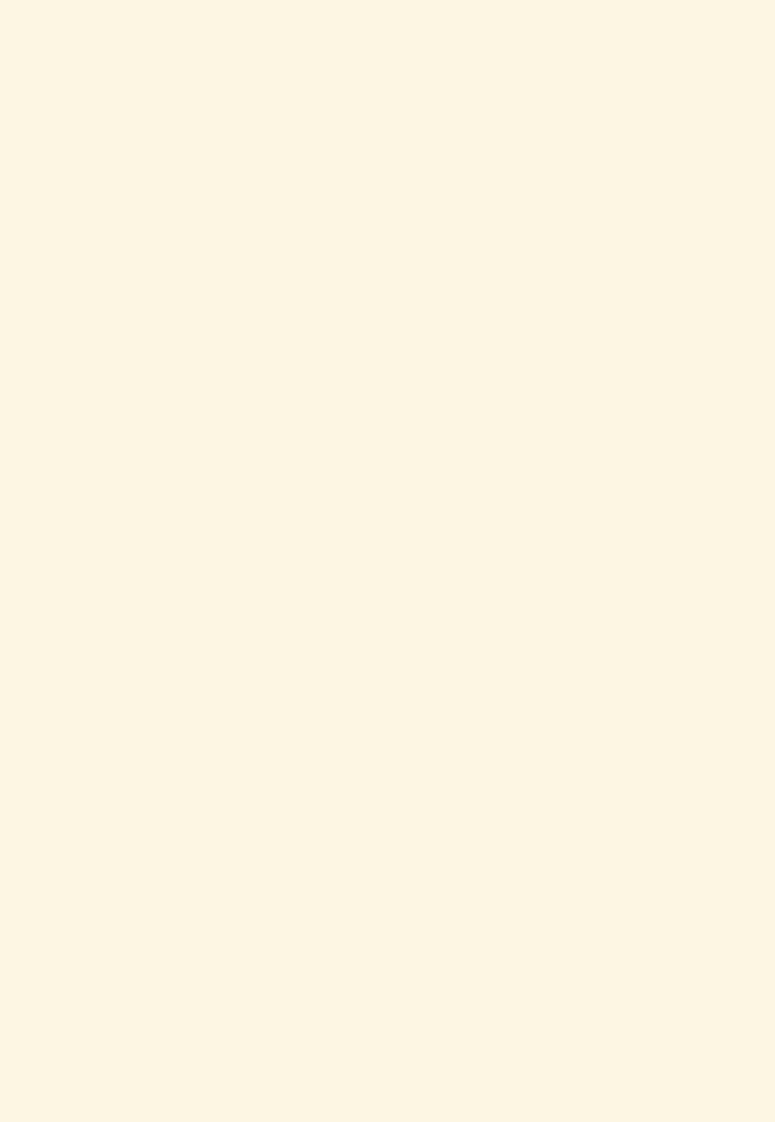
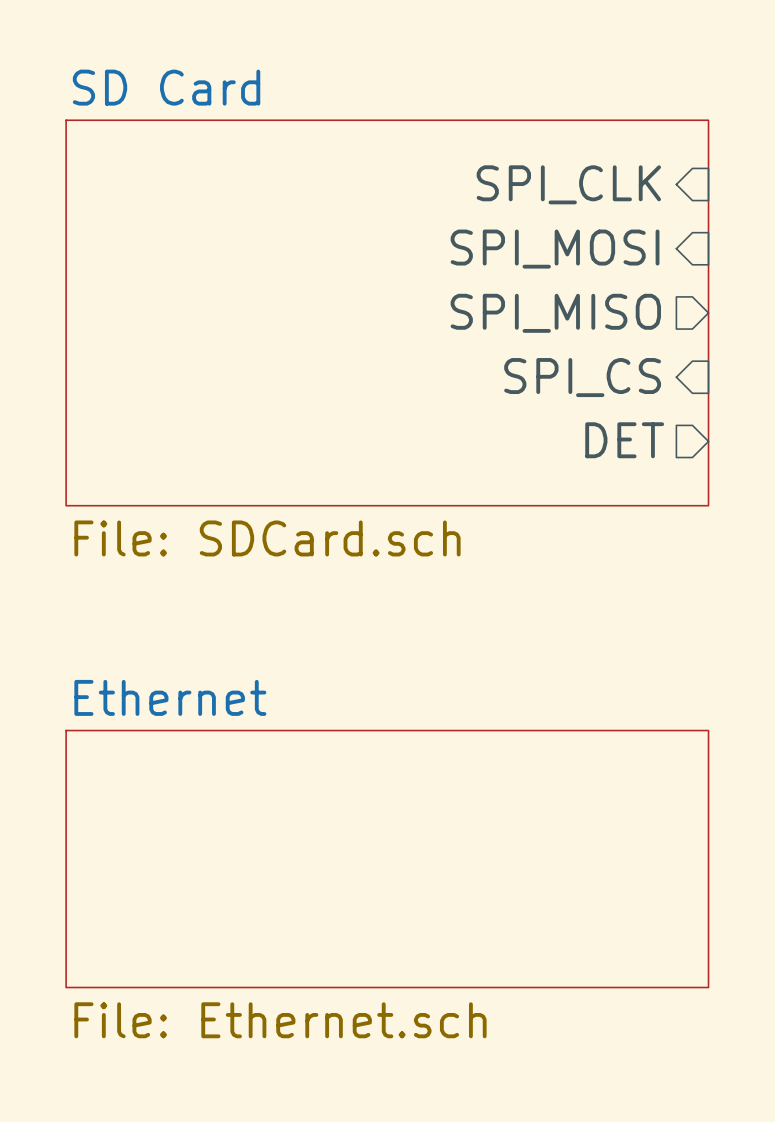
sheet pin: none -> SPI_CLK (568, 184)
sheet pin: none -> SPI_MOSI (555, 249)
sheet SD Card: none -> File: SDCard.sch (387, 312)
sheet pin: none -> SPI_MISO (555, 313)
sheet pin: none -> SPI_CS (582, 377)
sheet pin: none -> DET (624, 440)
sheet Ethernet: none -> File: Ethernet.sch (387, 859)

